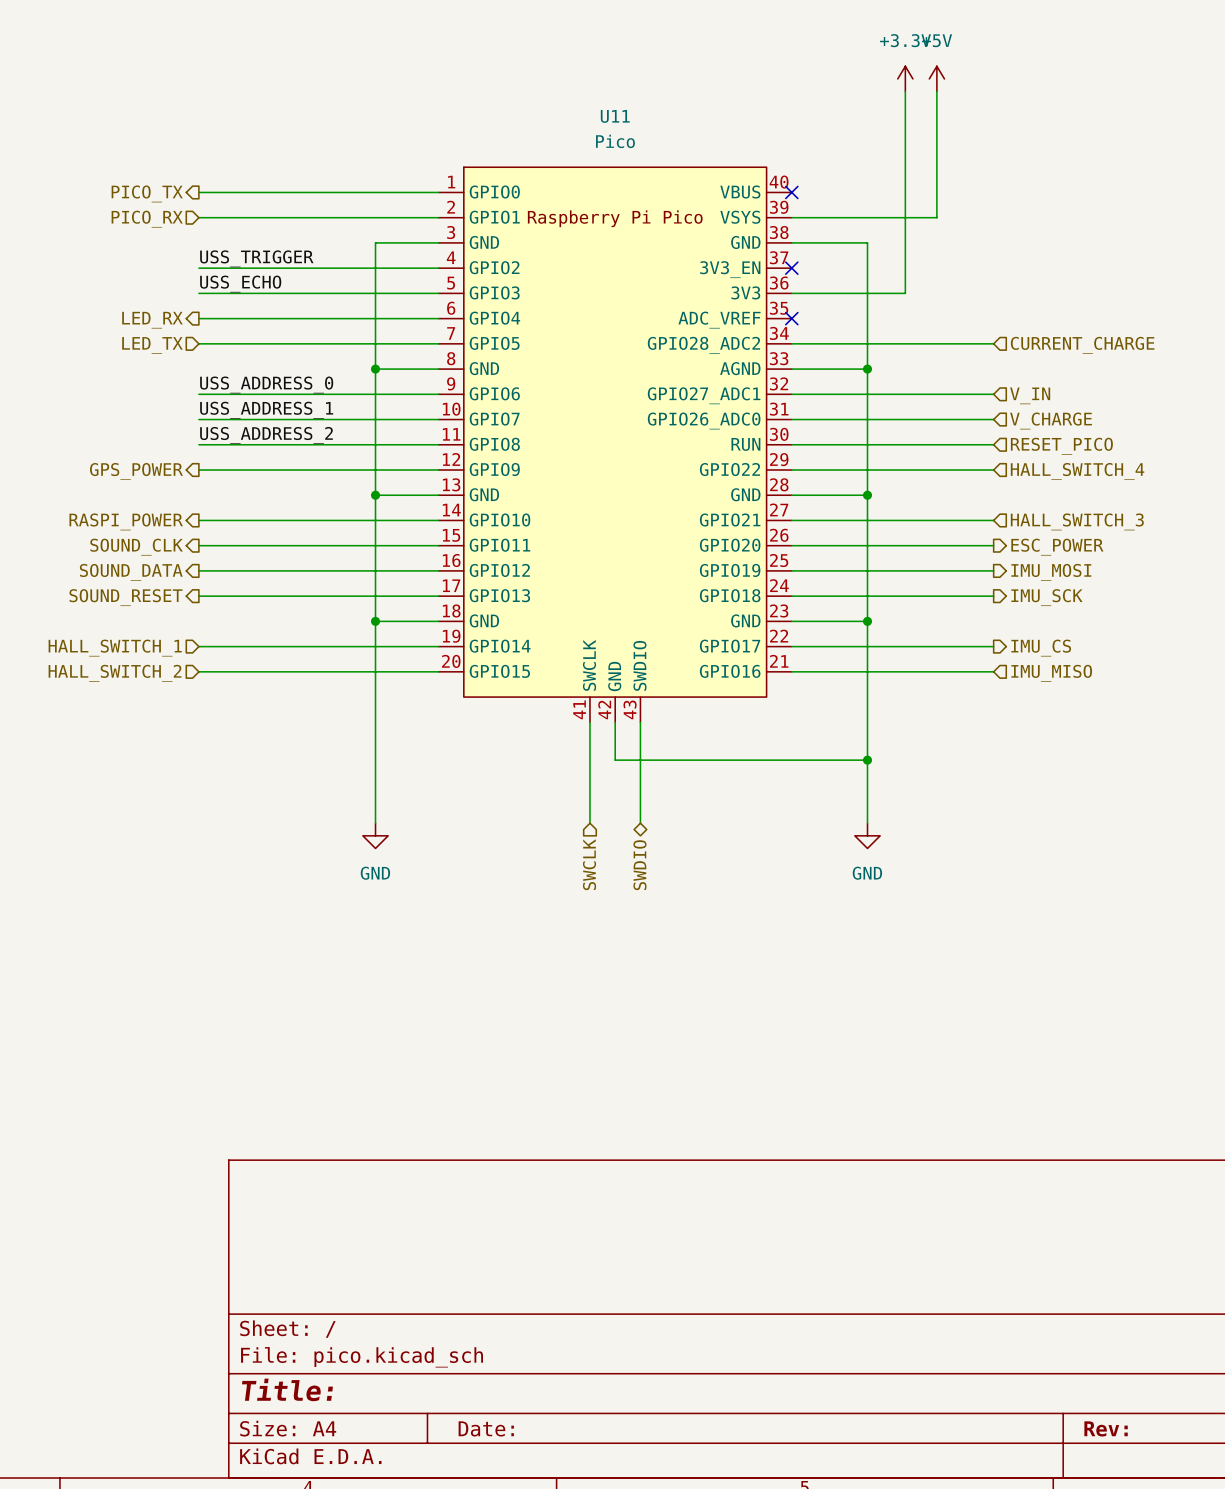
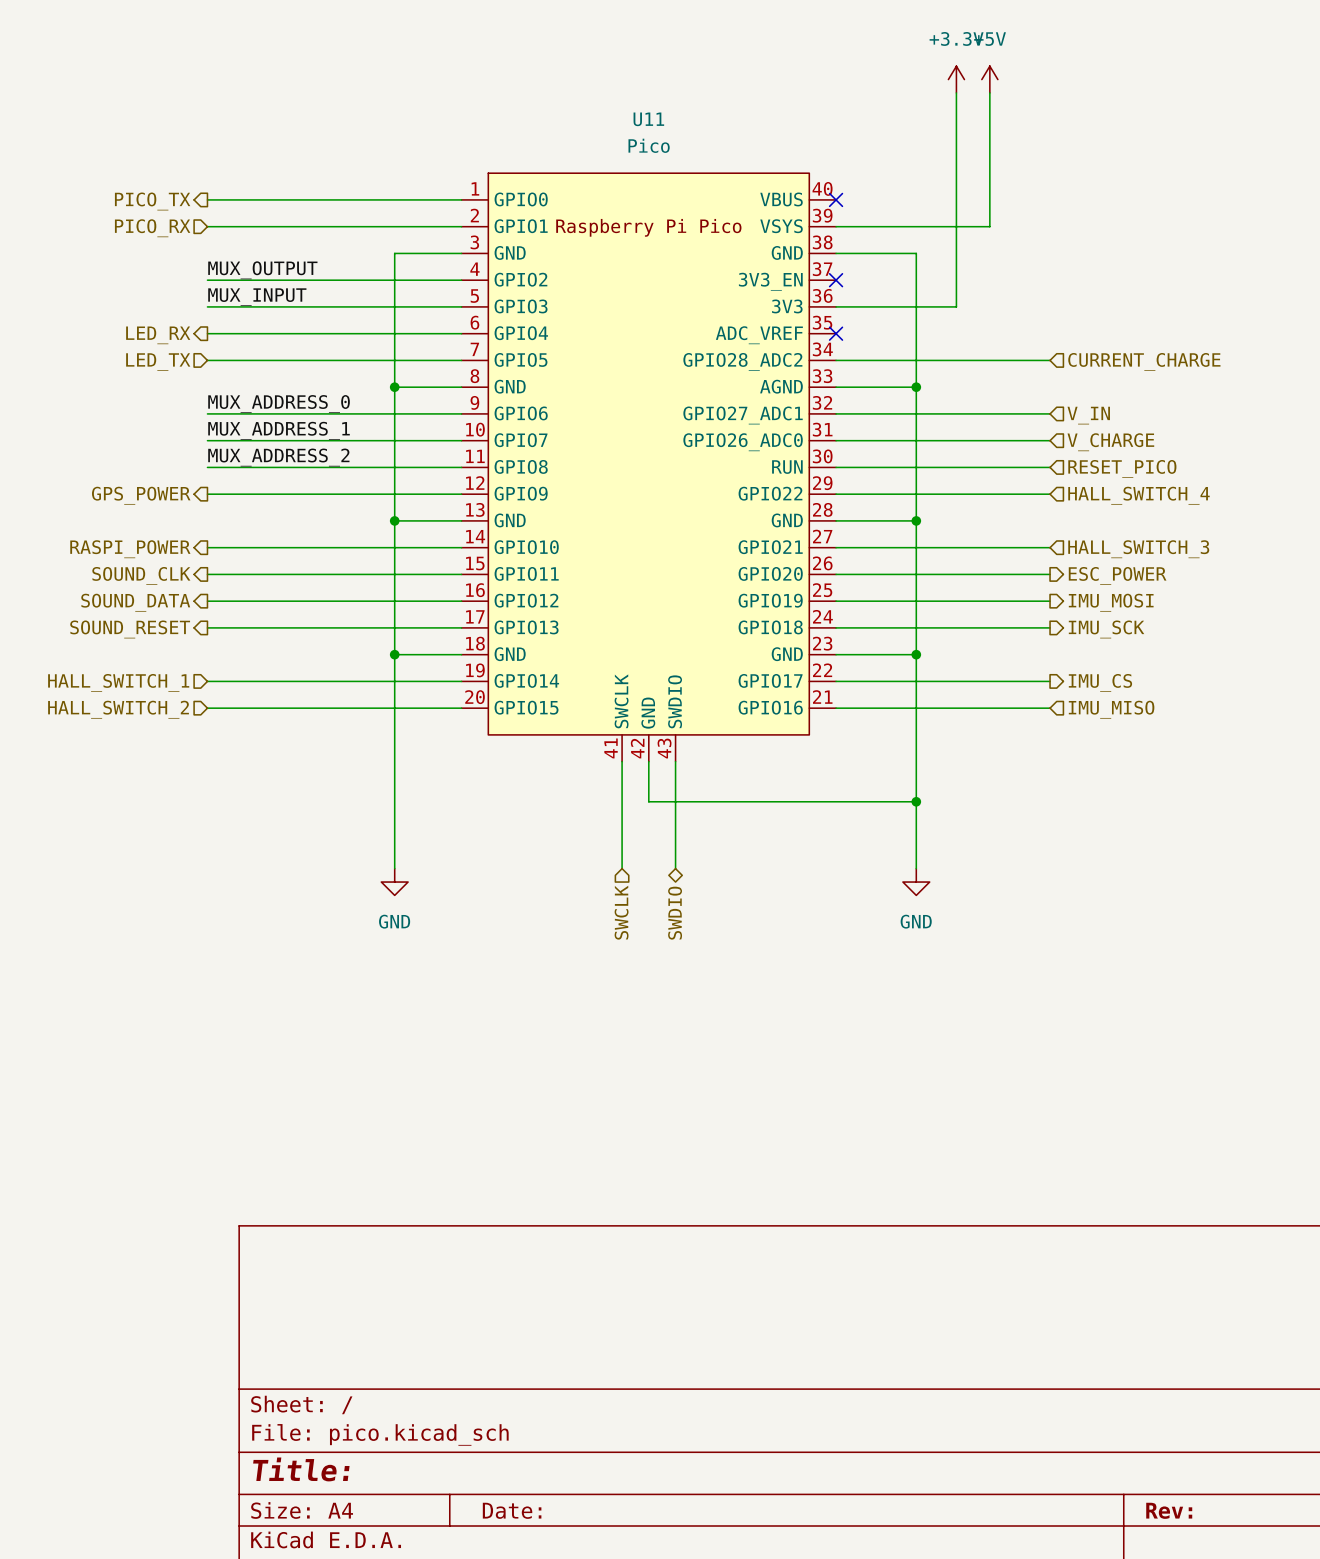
label: USS_TRIGGER (256, 258) -> MUX_OUTPUT (262, 270)
label: USS_ECHO (240, 284) -> MUX_INPUT (257, 297)
label: USS_ADDRESS_0 (266, 384) -> MUX_ADDRESS_0 (279, 404)
label: USS_ADDRESS_1 (266, 410) -> MUX_ADDRESS_1 (279, 430)
label: USS_ADDRESS_2 (266, 435) -> MUX_ADDRESS_2 (278, 457)

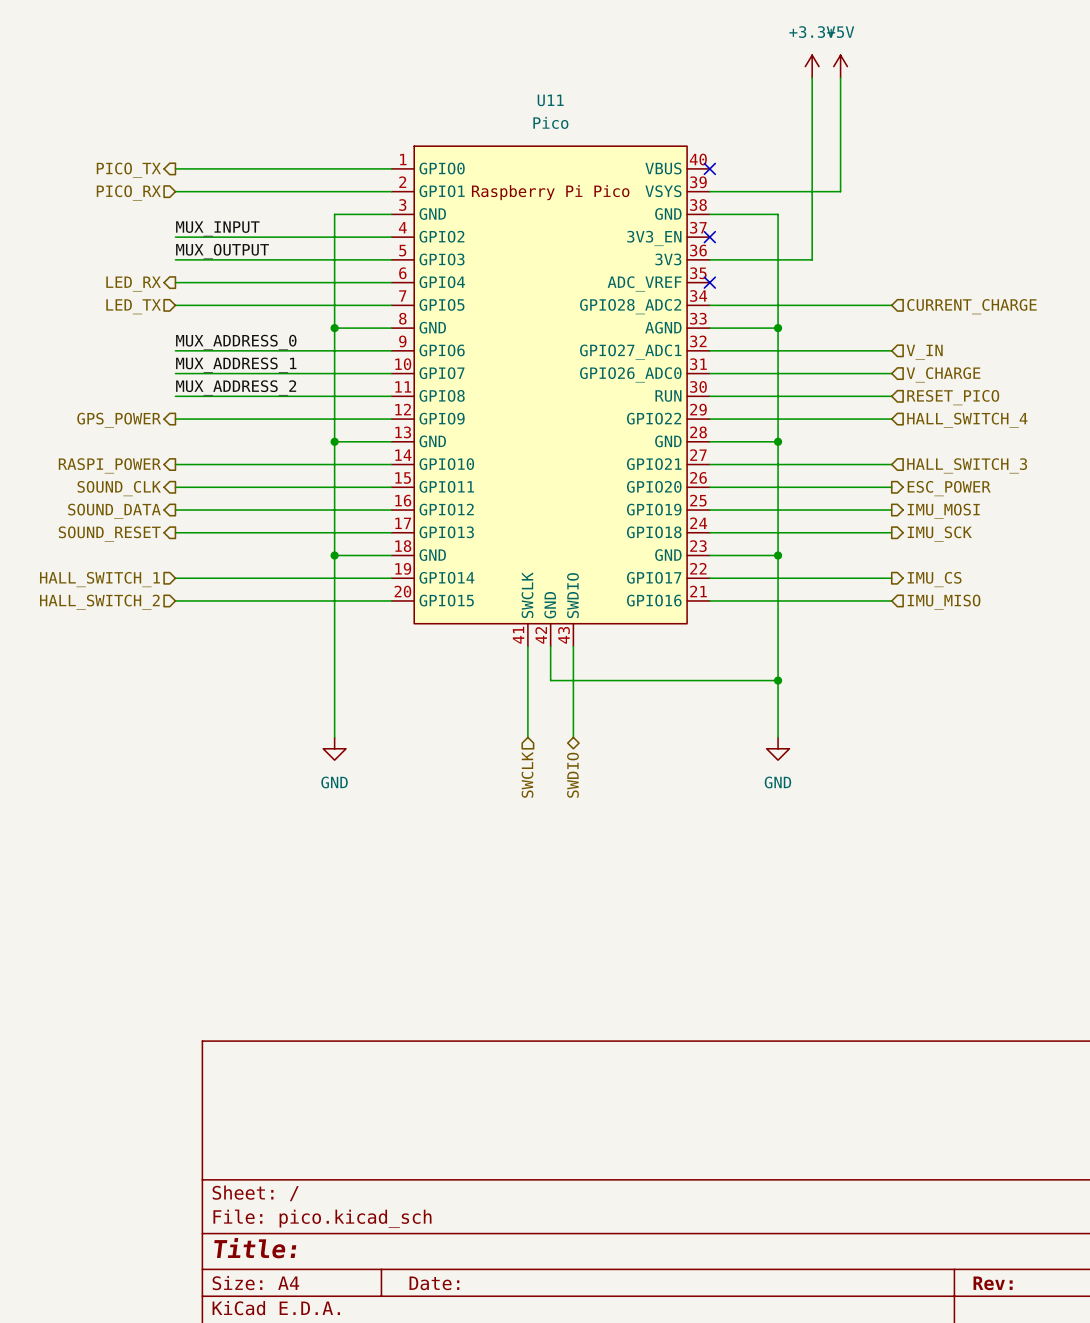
label: MUX_OUTPUT (262, 270) -> MUX_INPUT (217, 228)
label: MUX_INPUT (257, 297) -> MUX_OUTPUT (222, 251)

